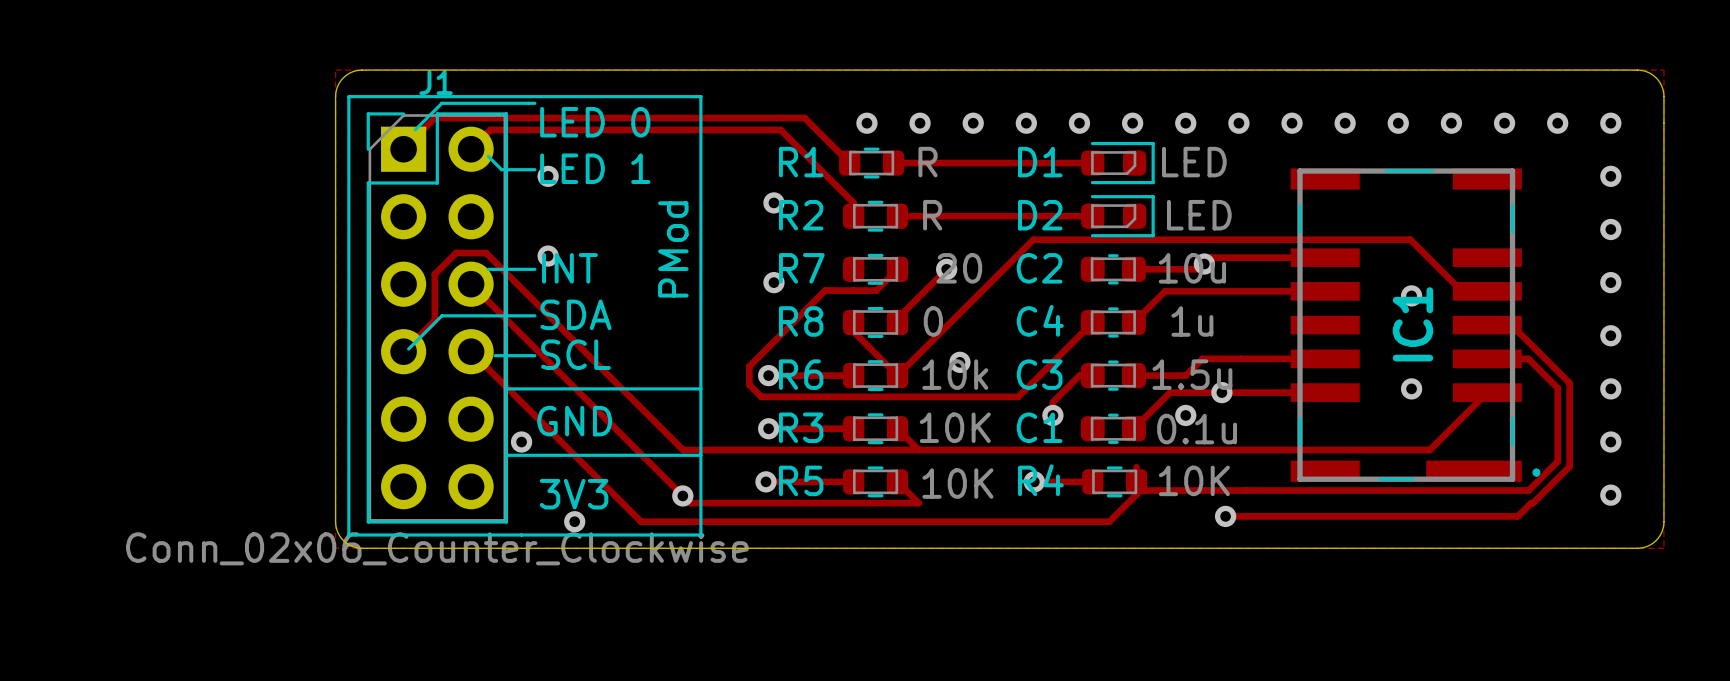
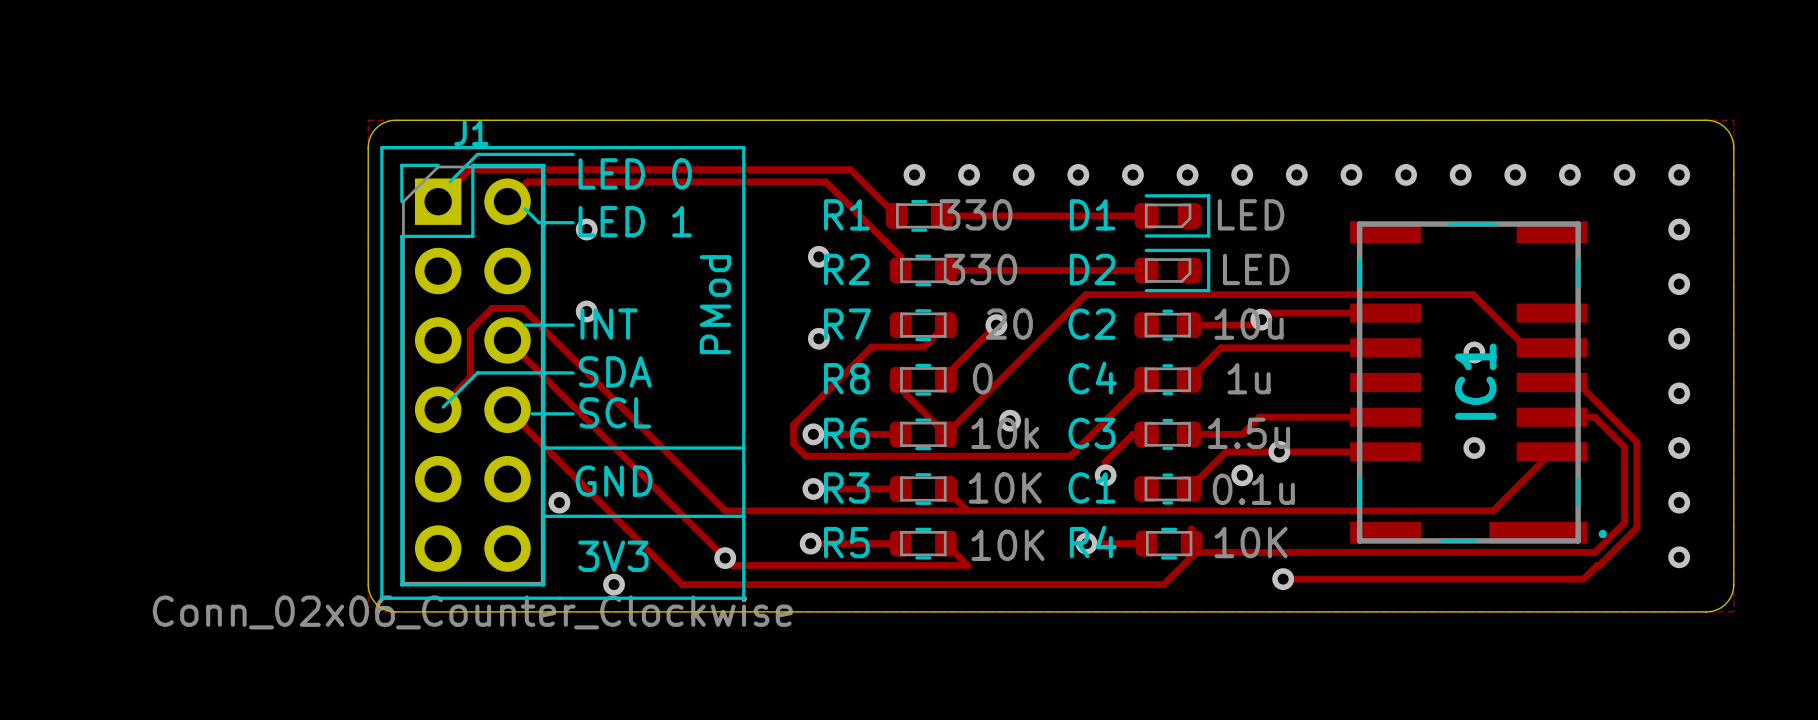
R1 value: R (928, 162) -> 330 (975, 214)
R2 value: R (932, 215) -> 330 (980, 269)

